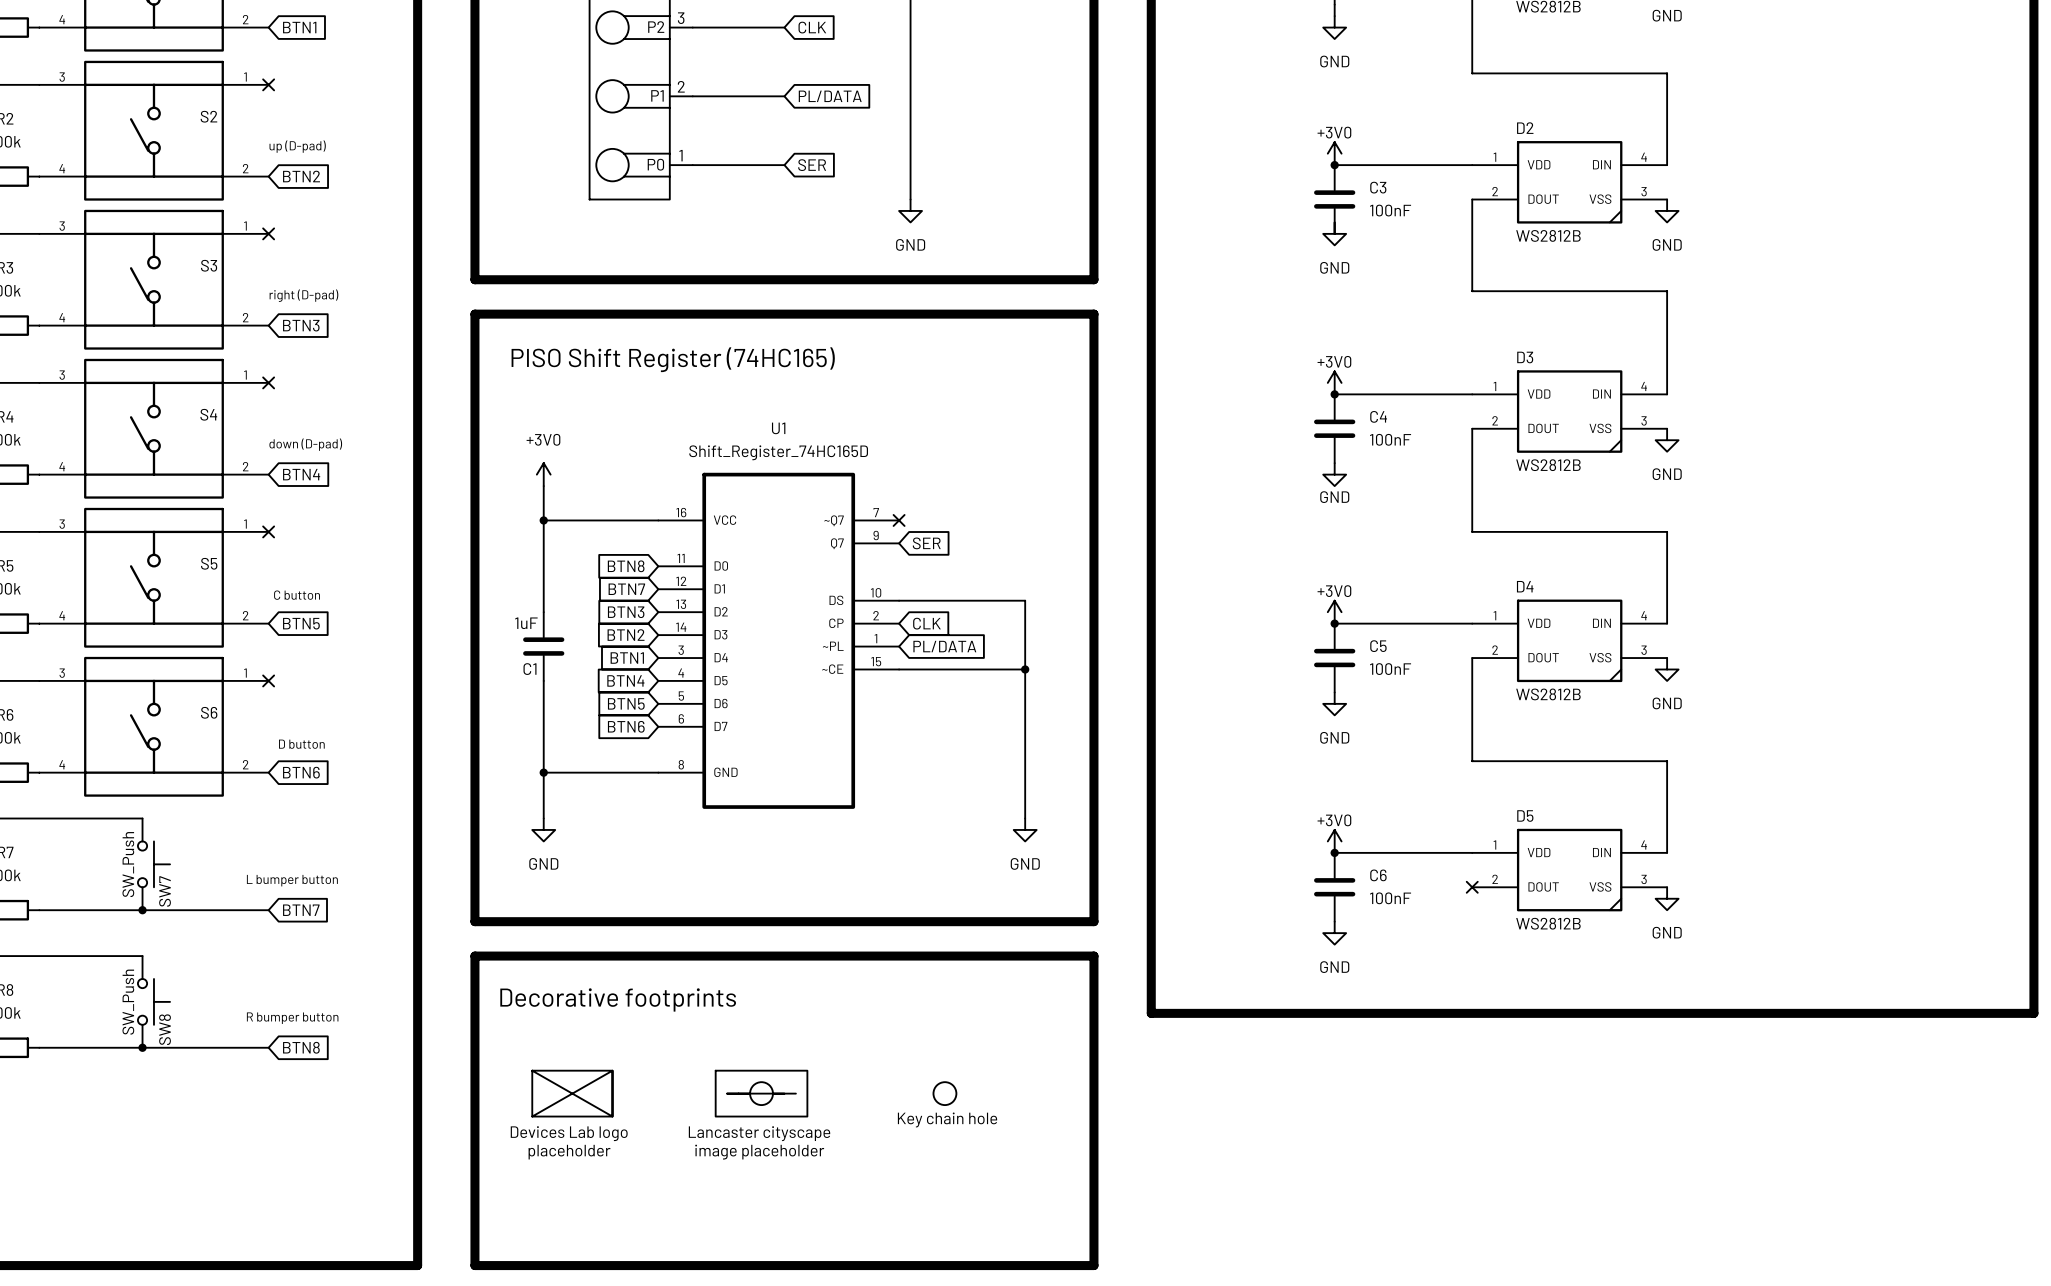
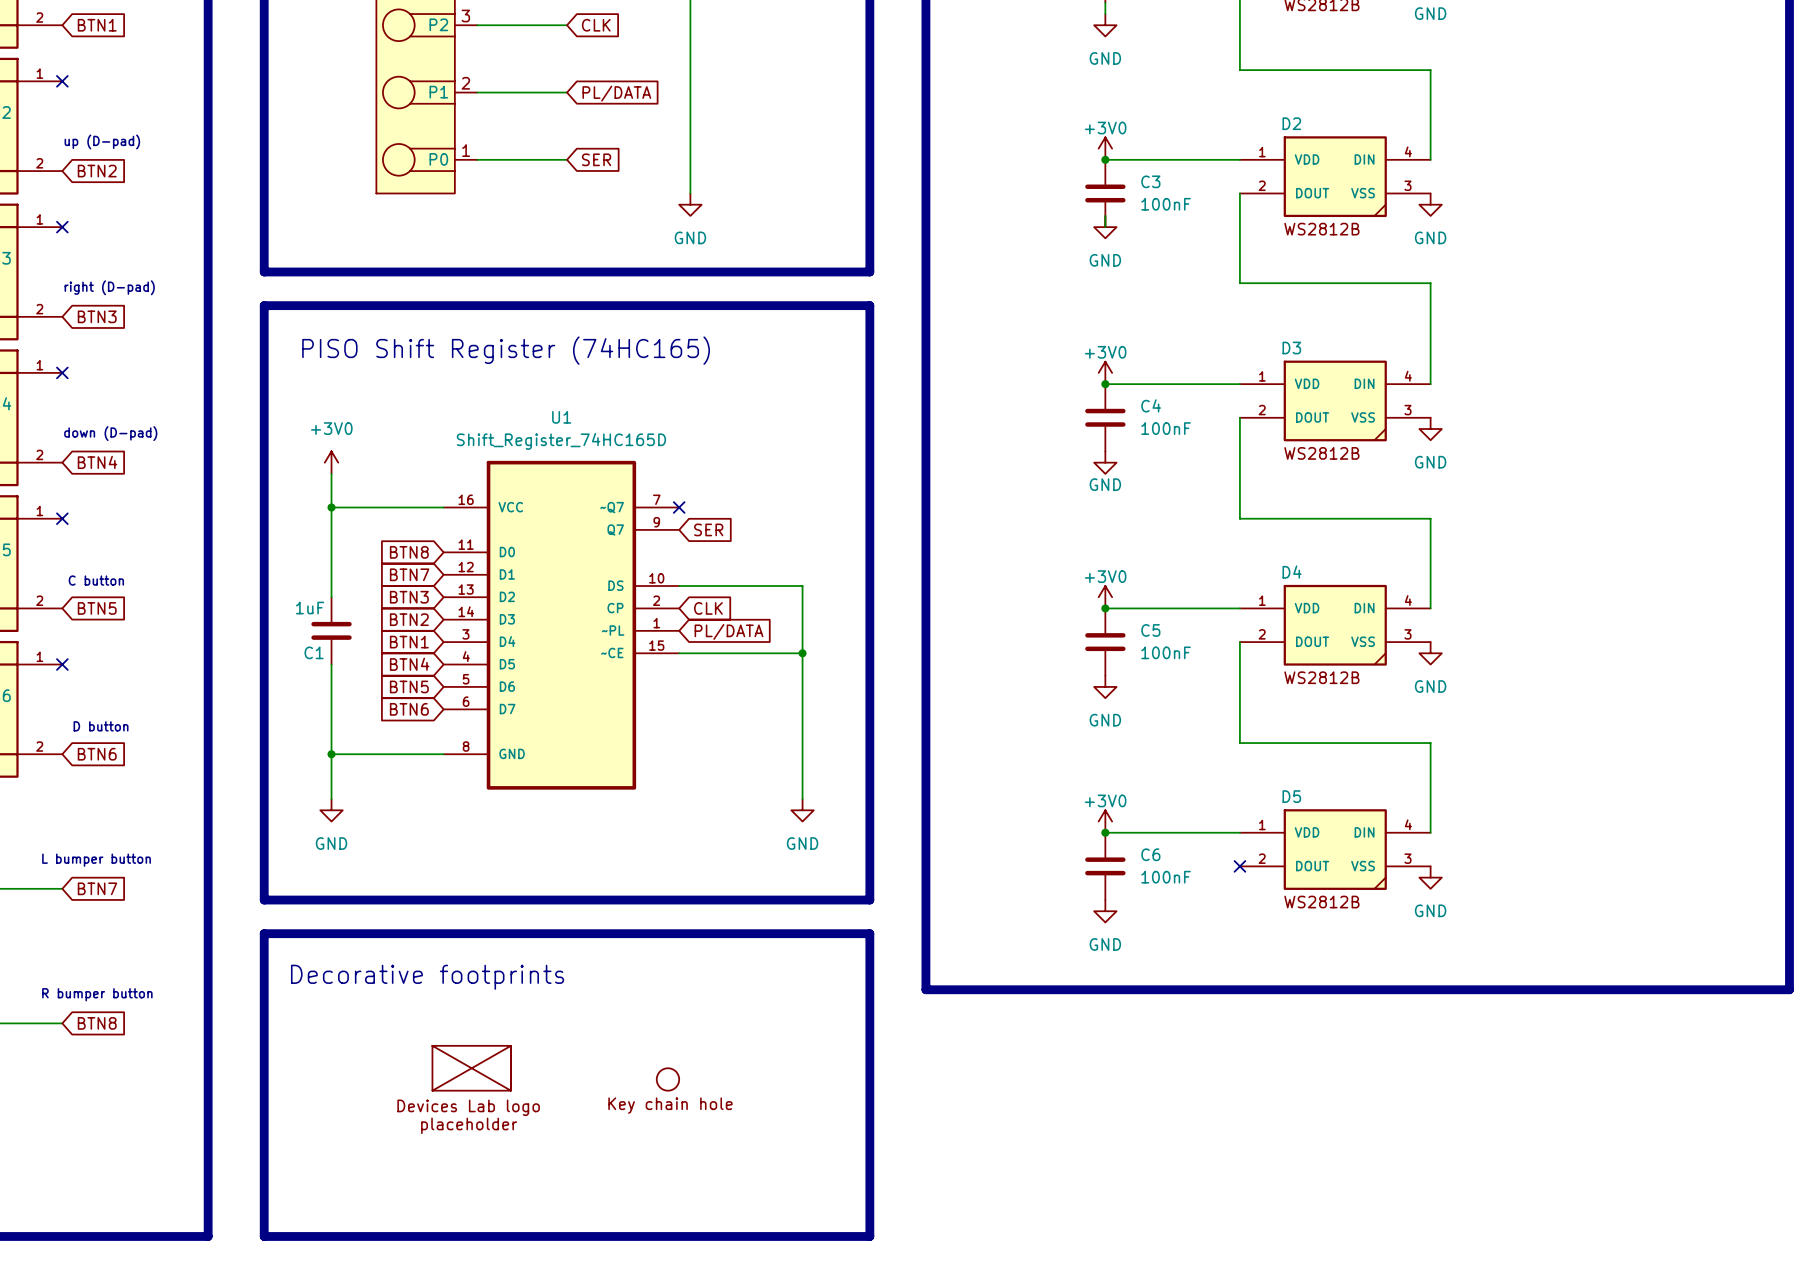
part position: (572, 1093) -> (471, 1068)
part: (761, 1093) -> none
part position: (944, 1093) -> (667, 1079)

